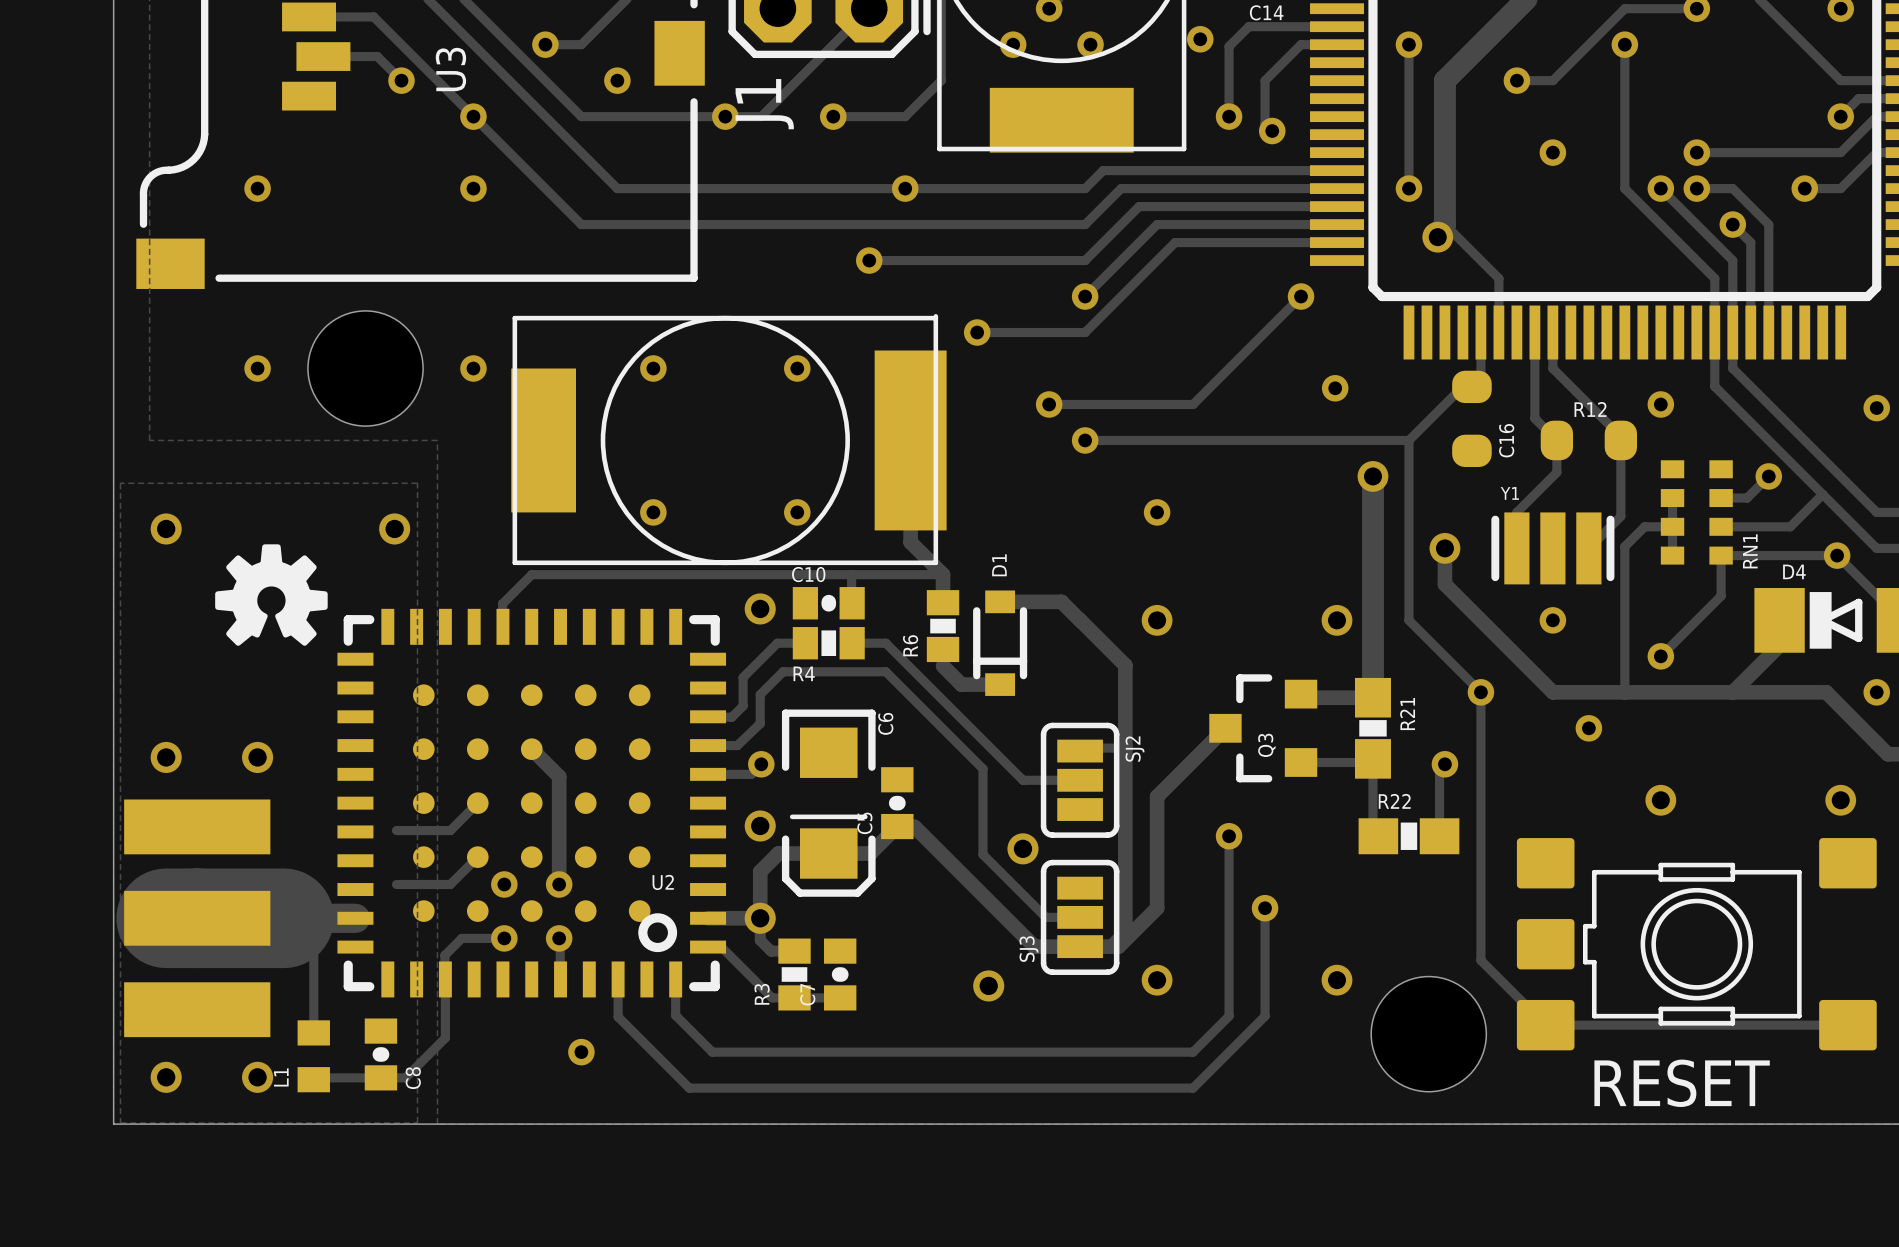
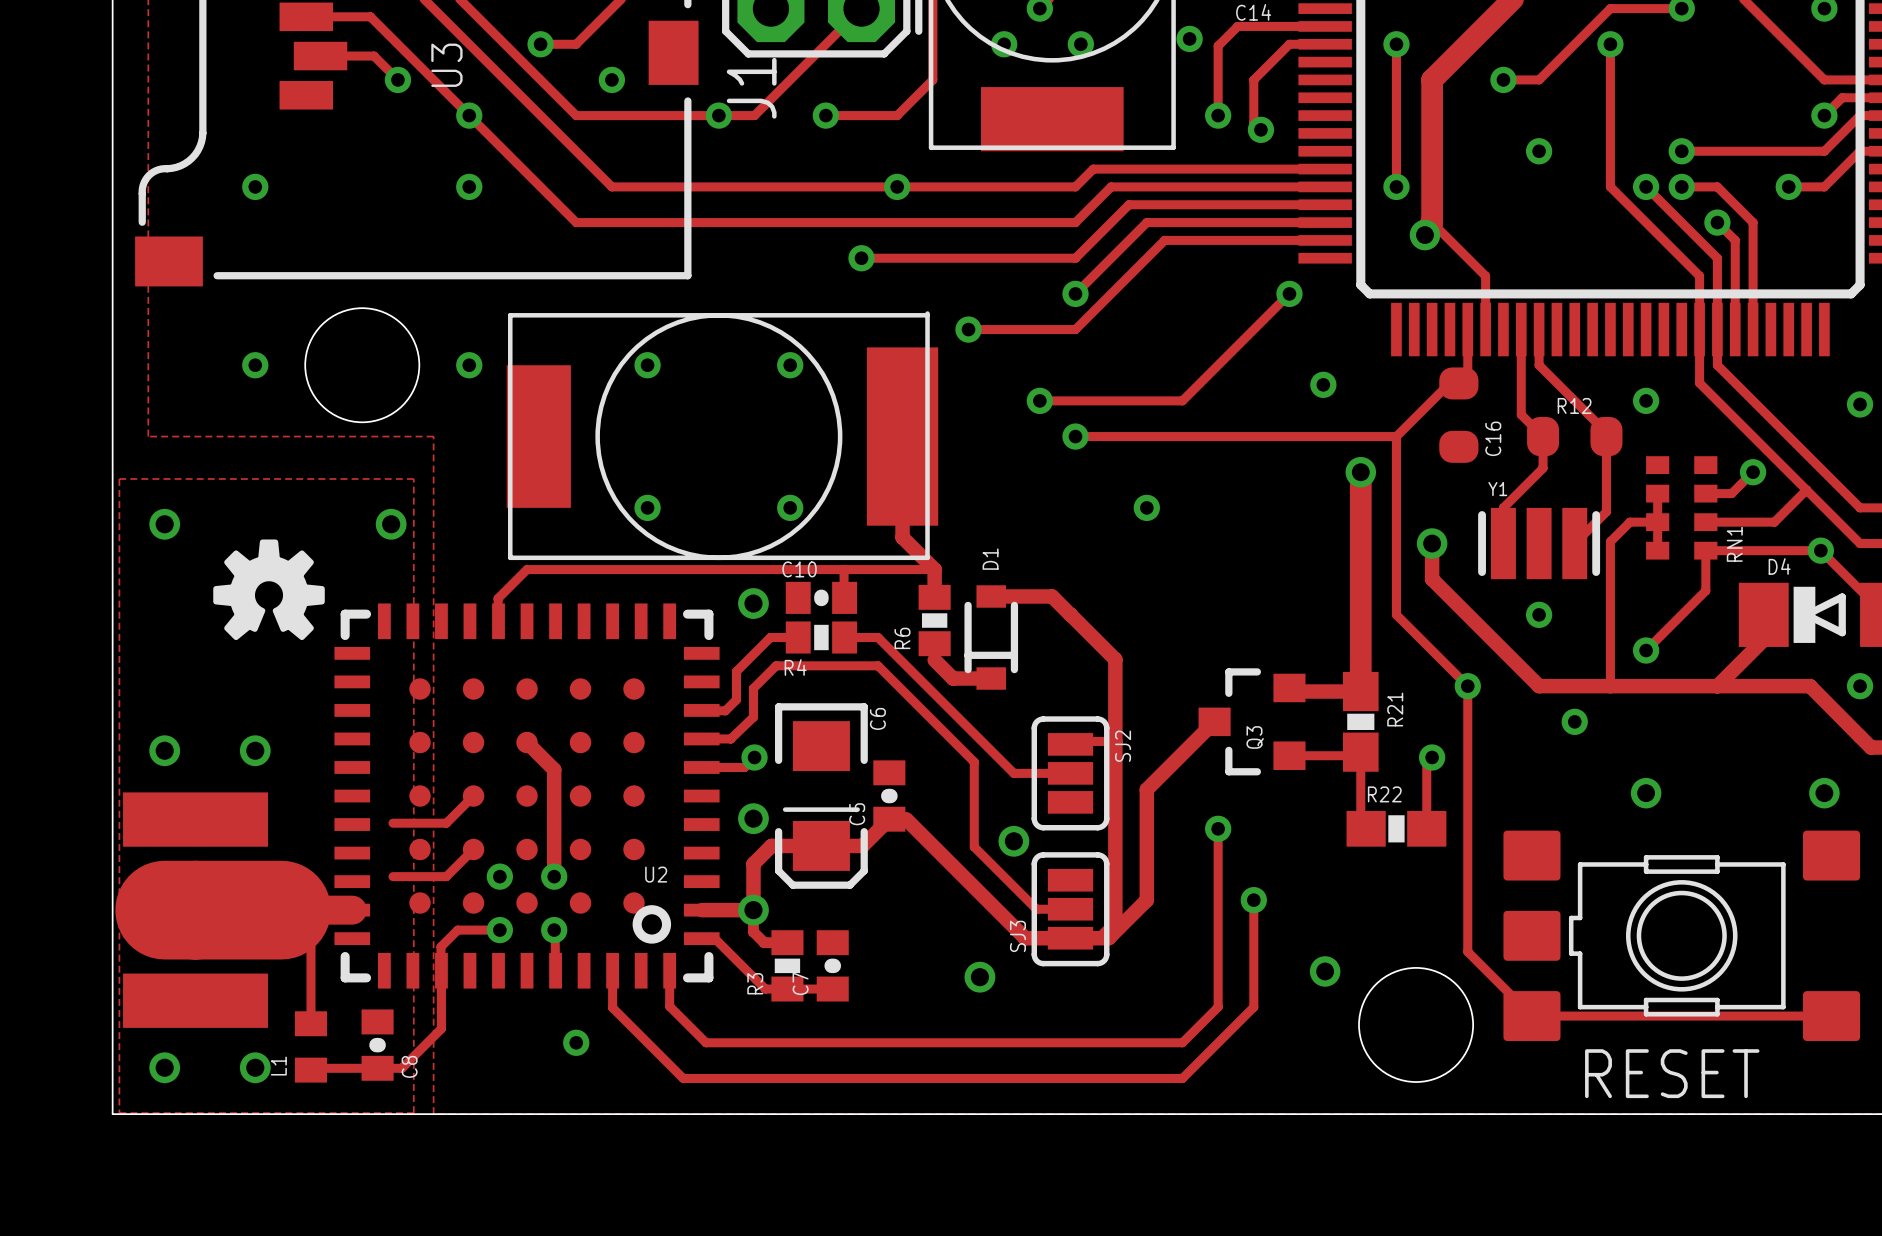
via: (1157, 620) -> none
via: (1337, 620) -> none
via: (1157, 980) -> none

